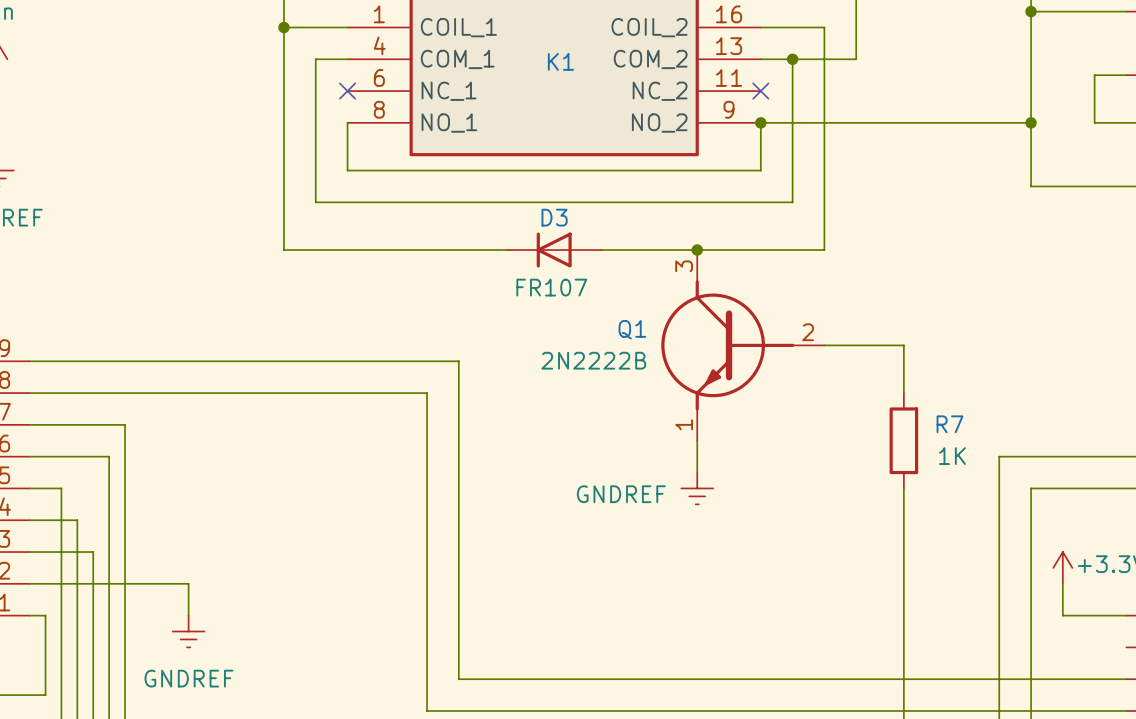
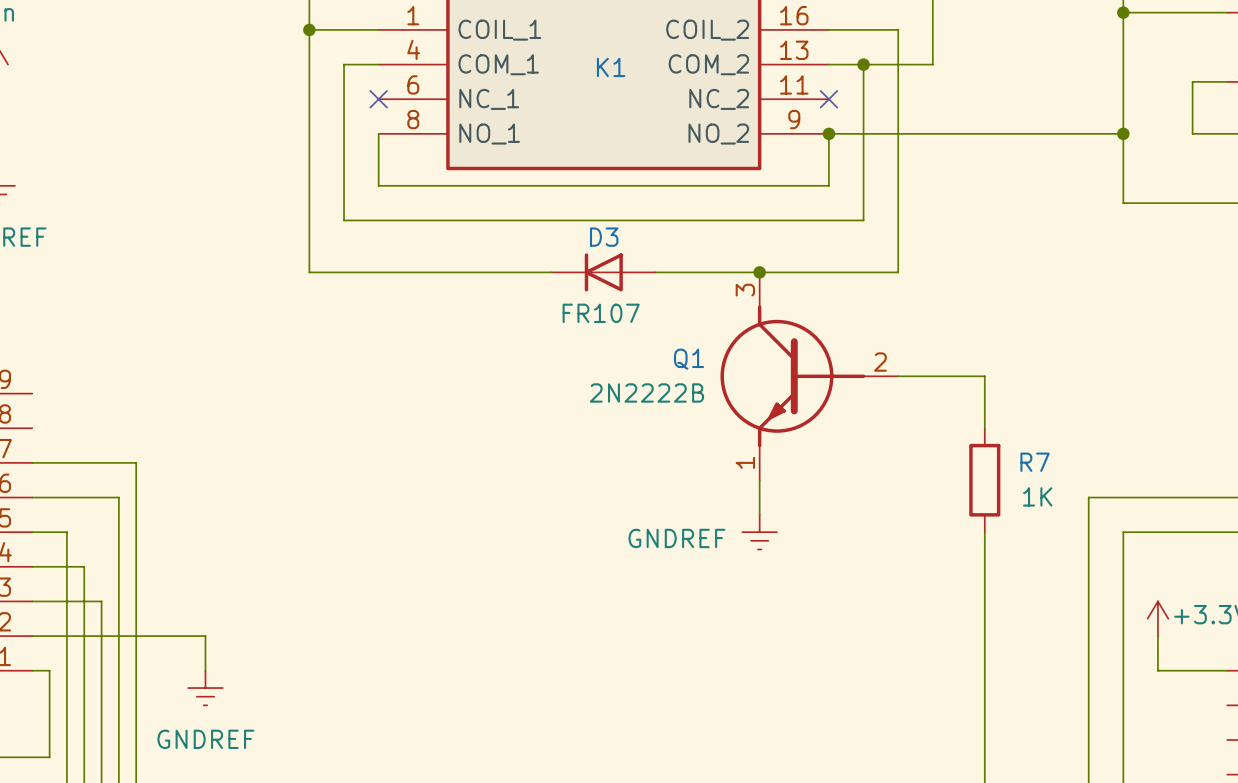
wire: (29, 361) (458, 361) (458, 679) (1126, 679) -> none
wire: (29, 393) (427, 393) (427, 710) (1126, 710) -> none

